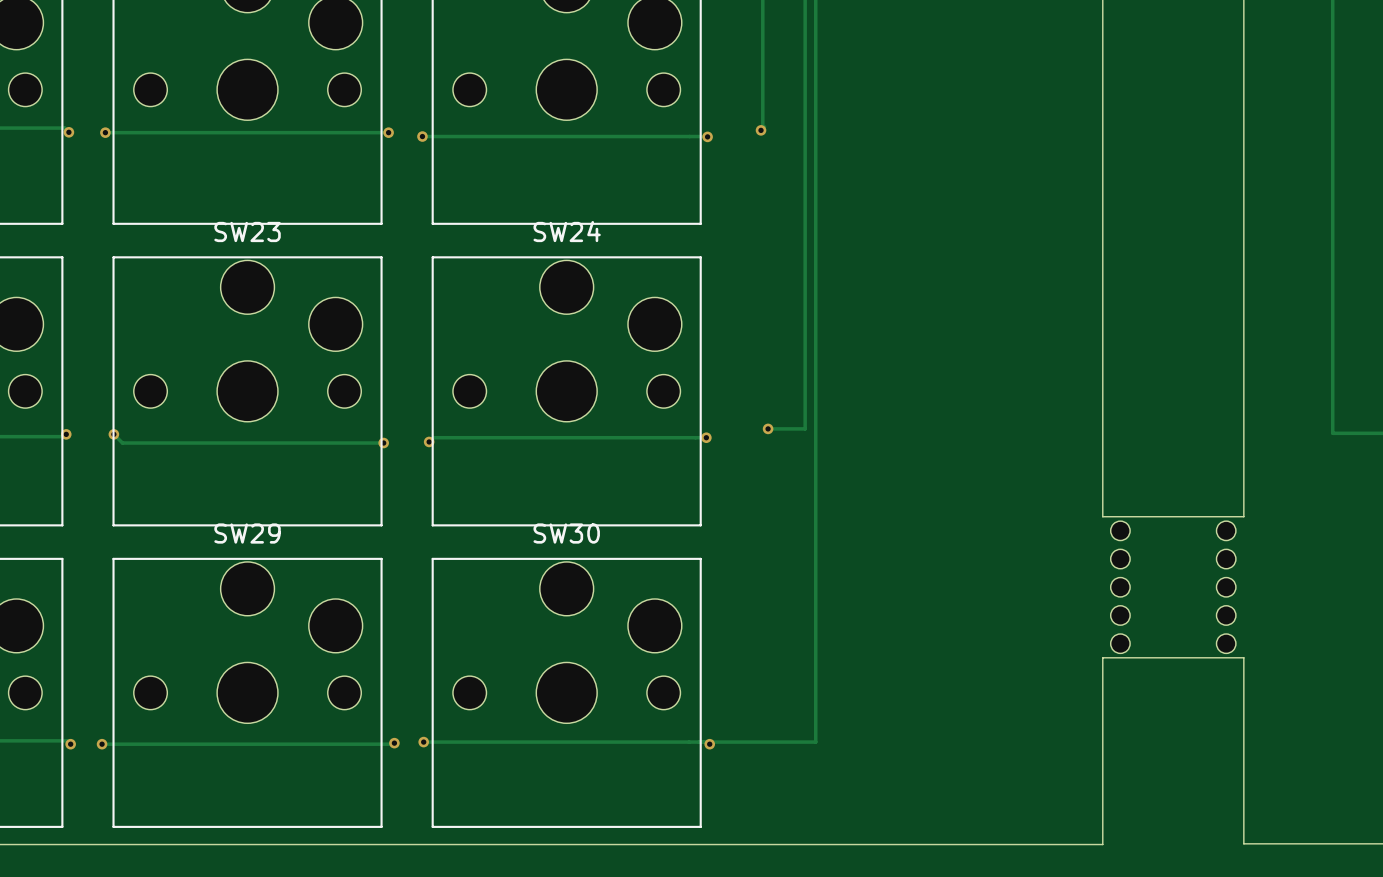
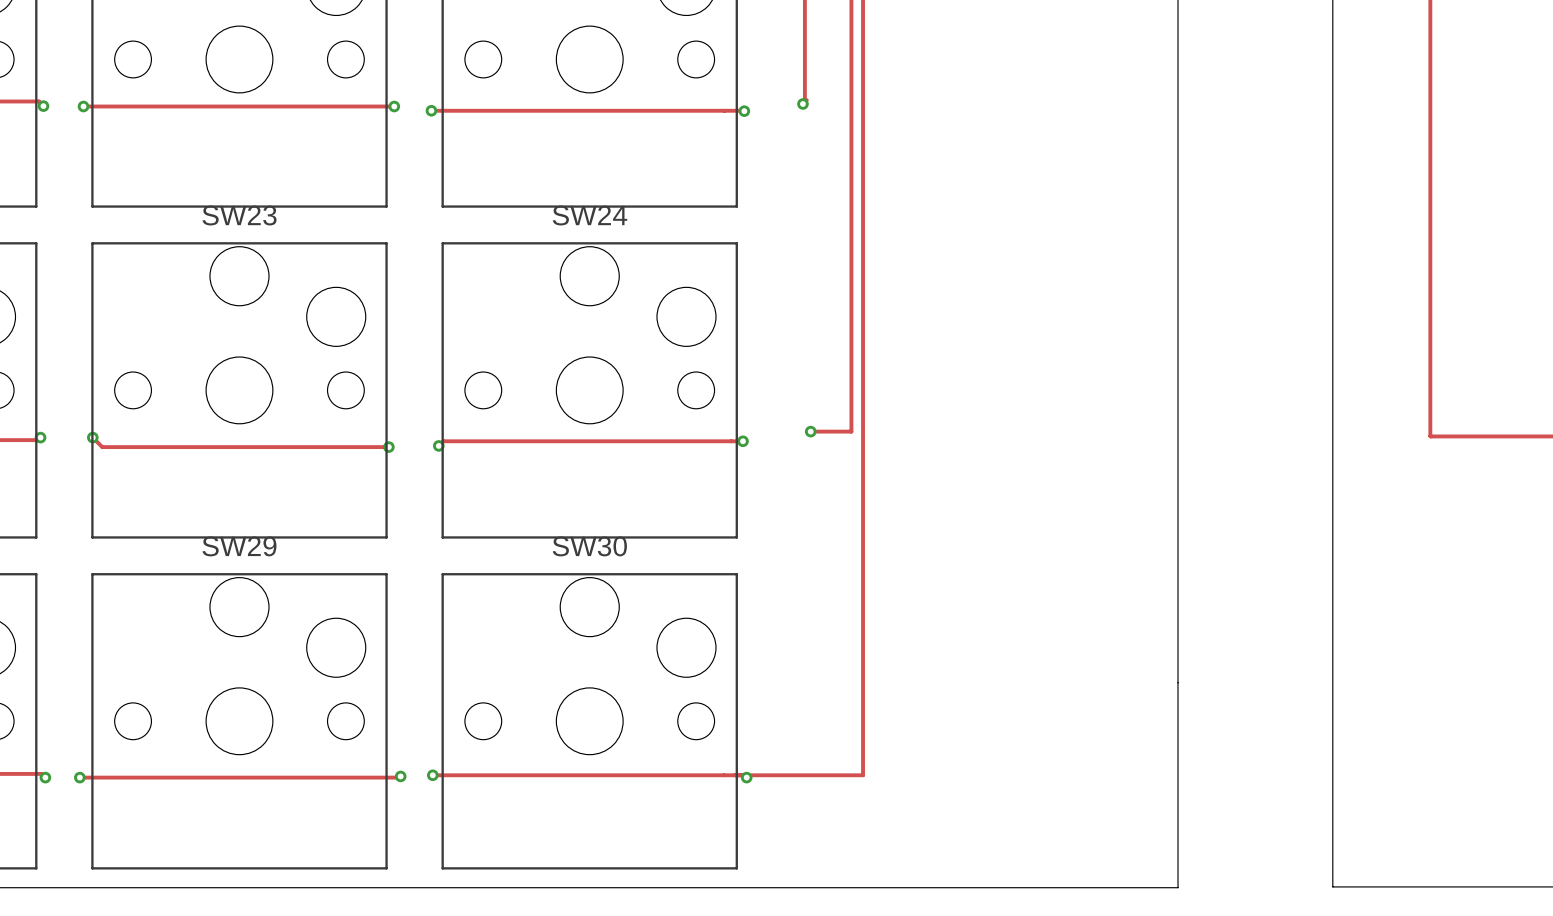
board edge: (1102, 516) (1243, 516) -> (1178, 527) (1178, 682)
part: (1120, 587) -> none
part: (1226, 587) -> none
board edge: (1102, 657) (1243, 657) -> (1332, 527) (1332, 682)

